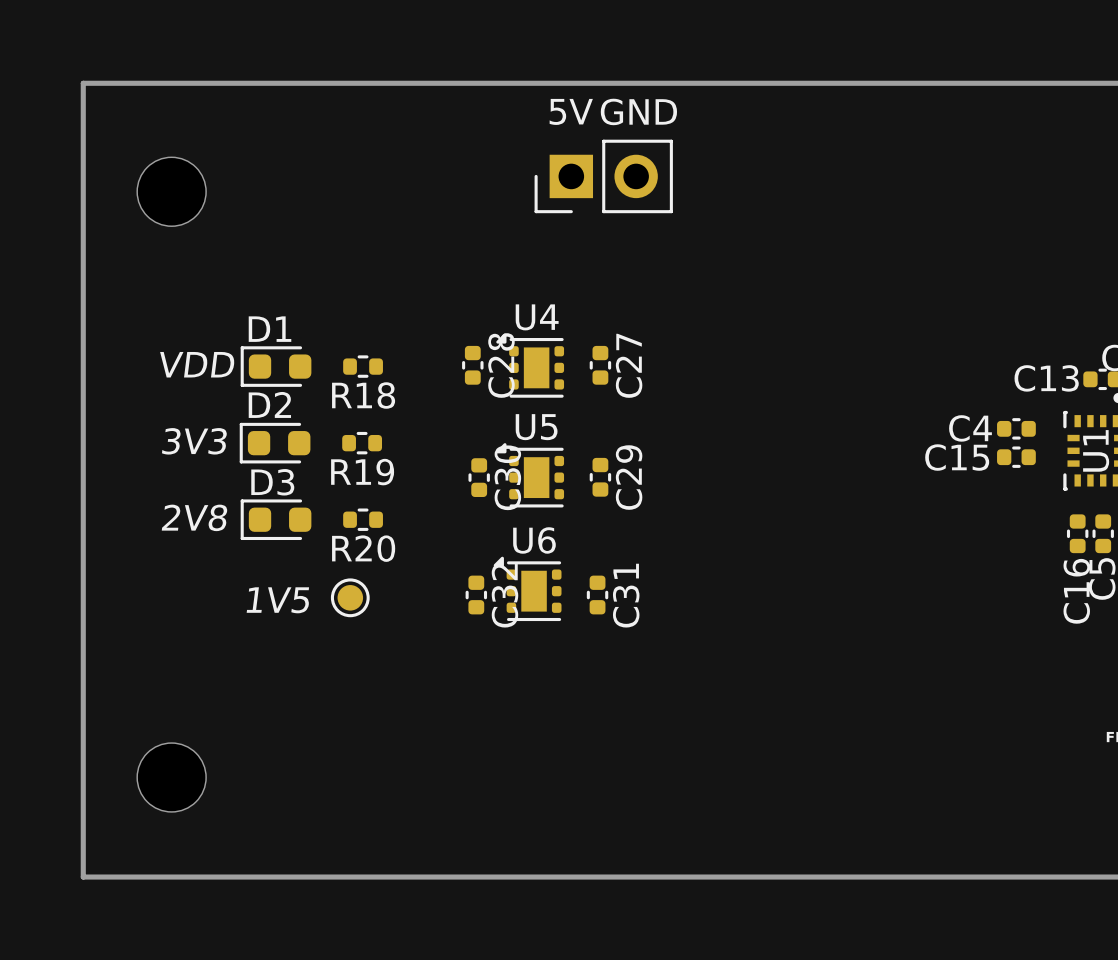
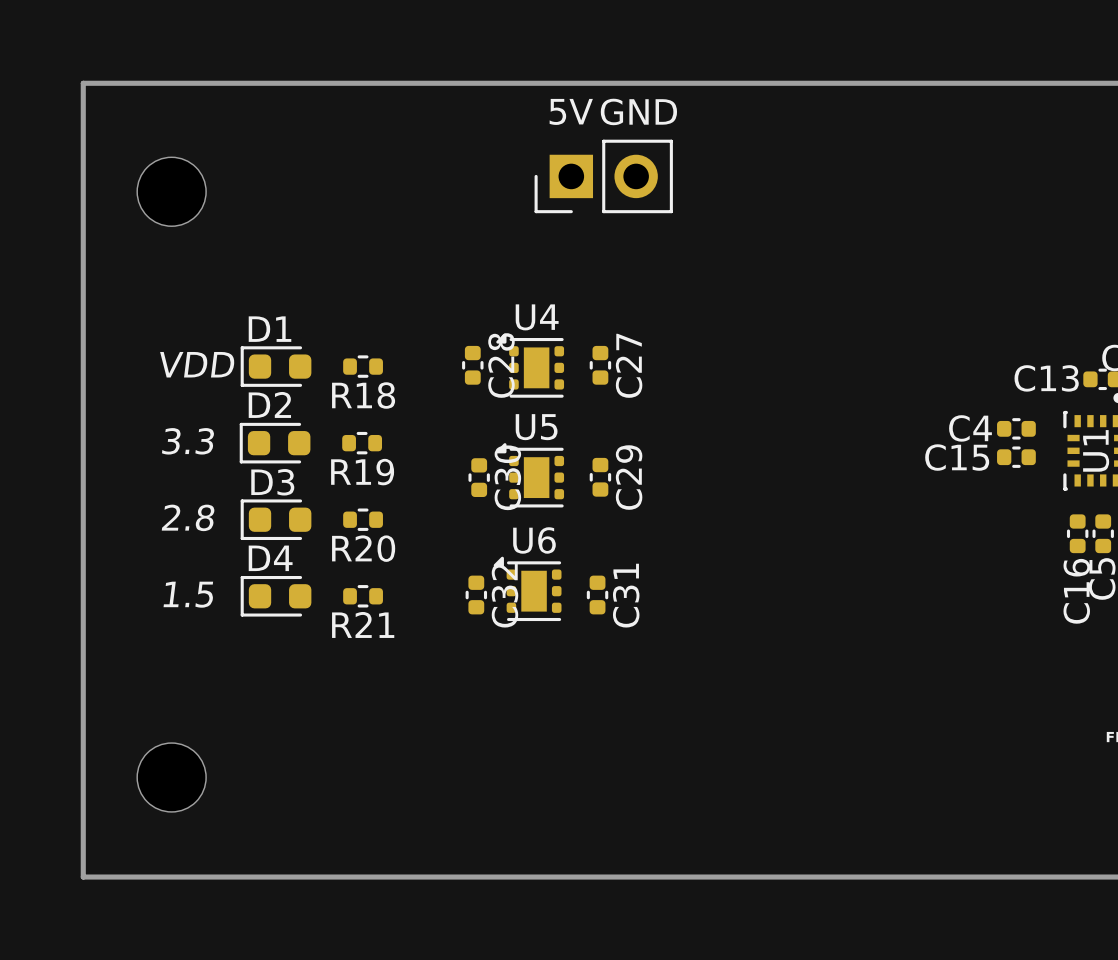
text: 3V3 (194, 441) -> 3.3 (188, 441)
text: 2V8 (194, 517) -> 2.8 (188, 517)
D4: none -> (276, 596)
R21: none -> (363, 596)
part: (350, 597) -> none
text: 1V5 (277, 600) -> 1.5 (188, 594)

